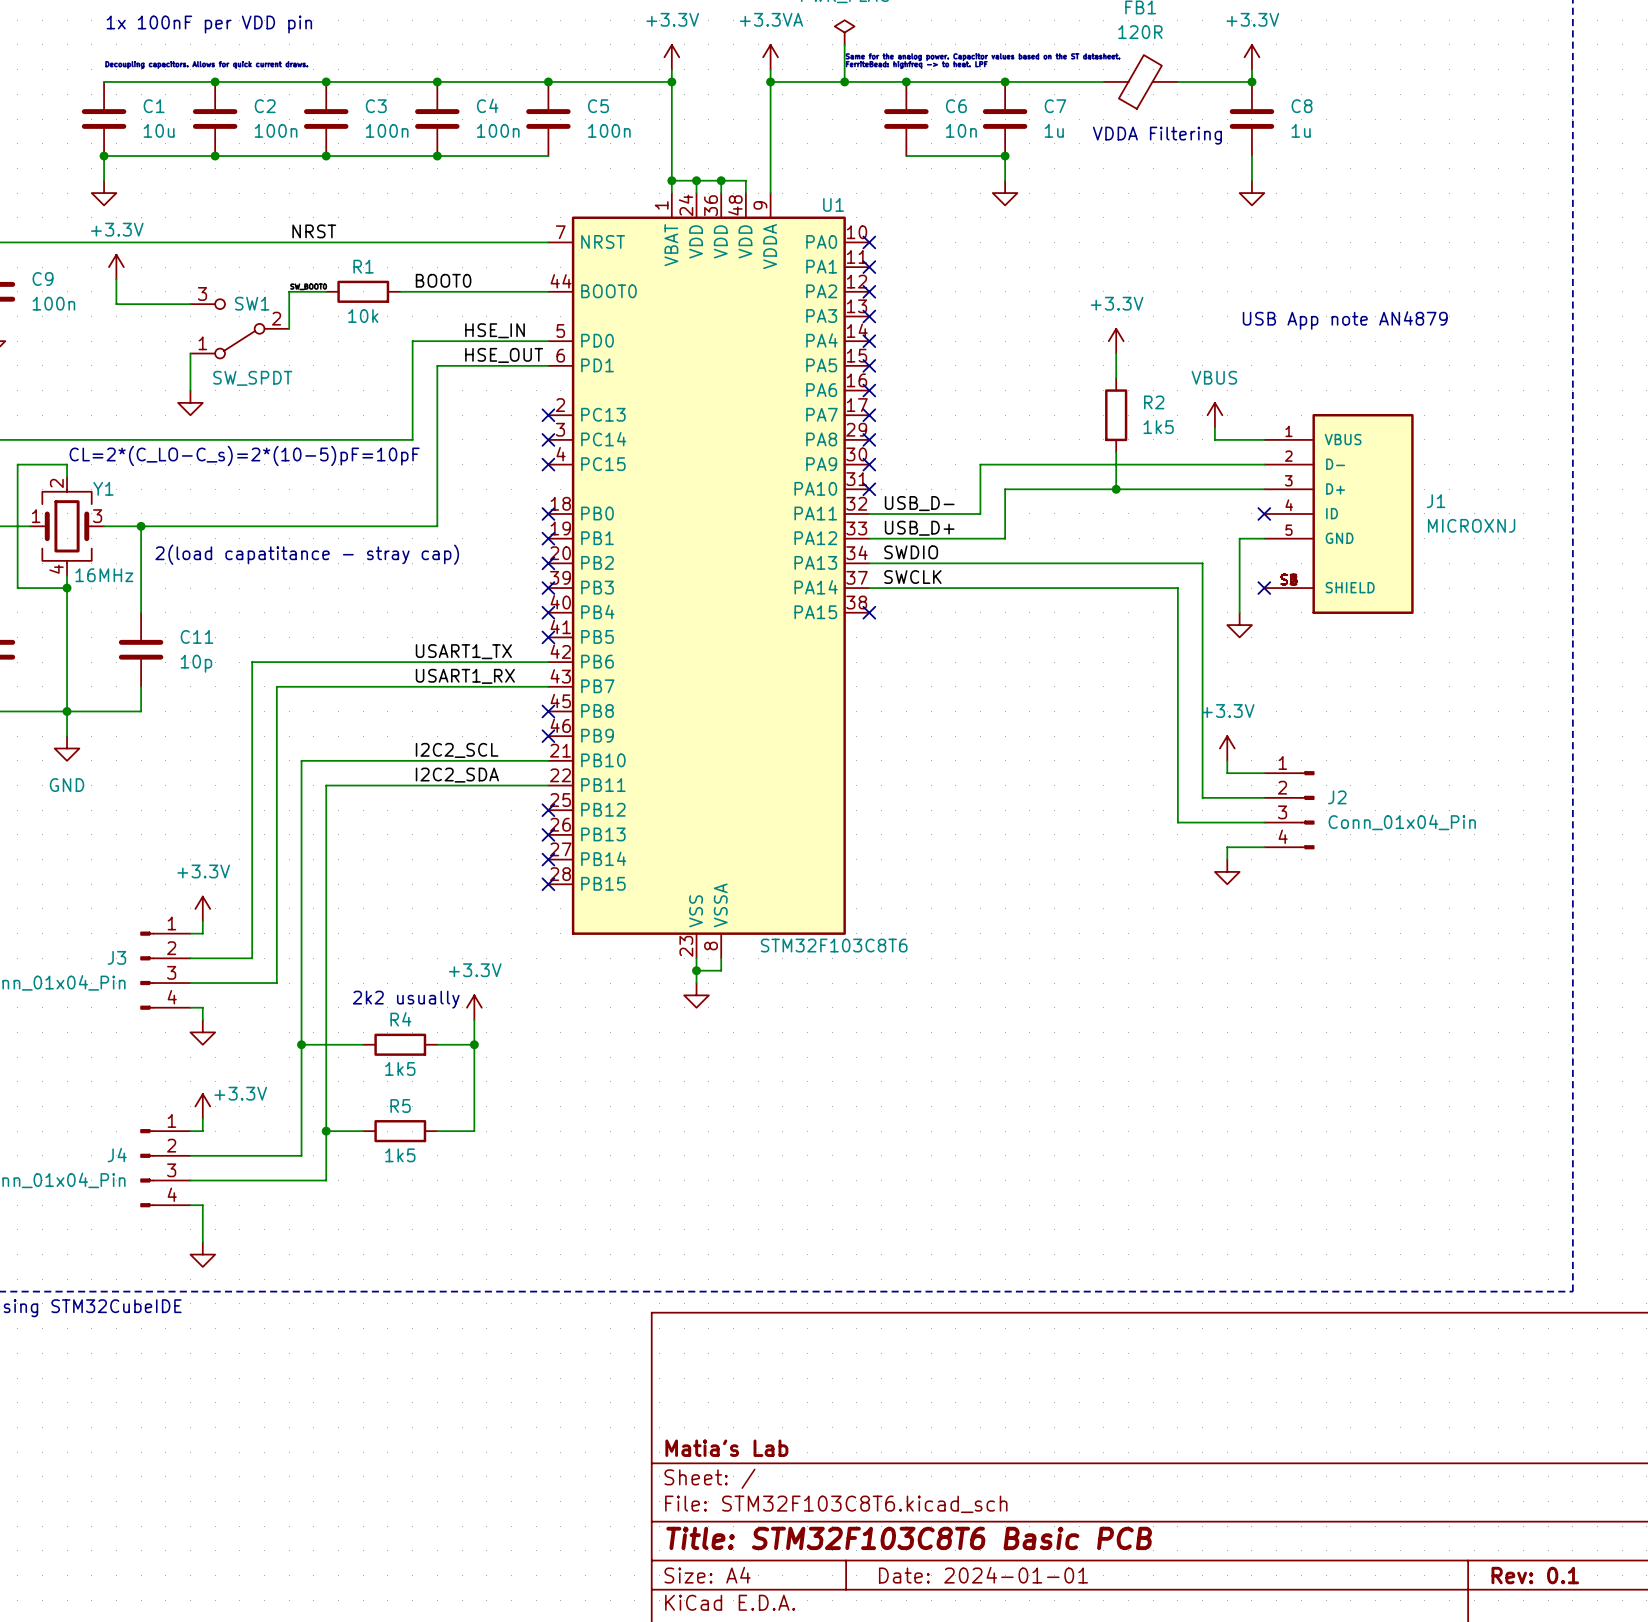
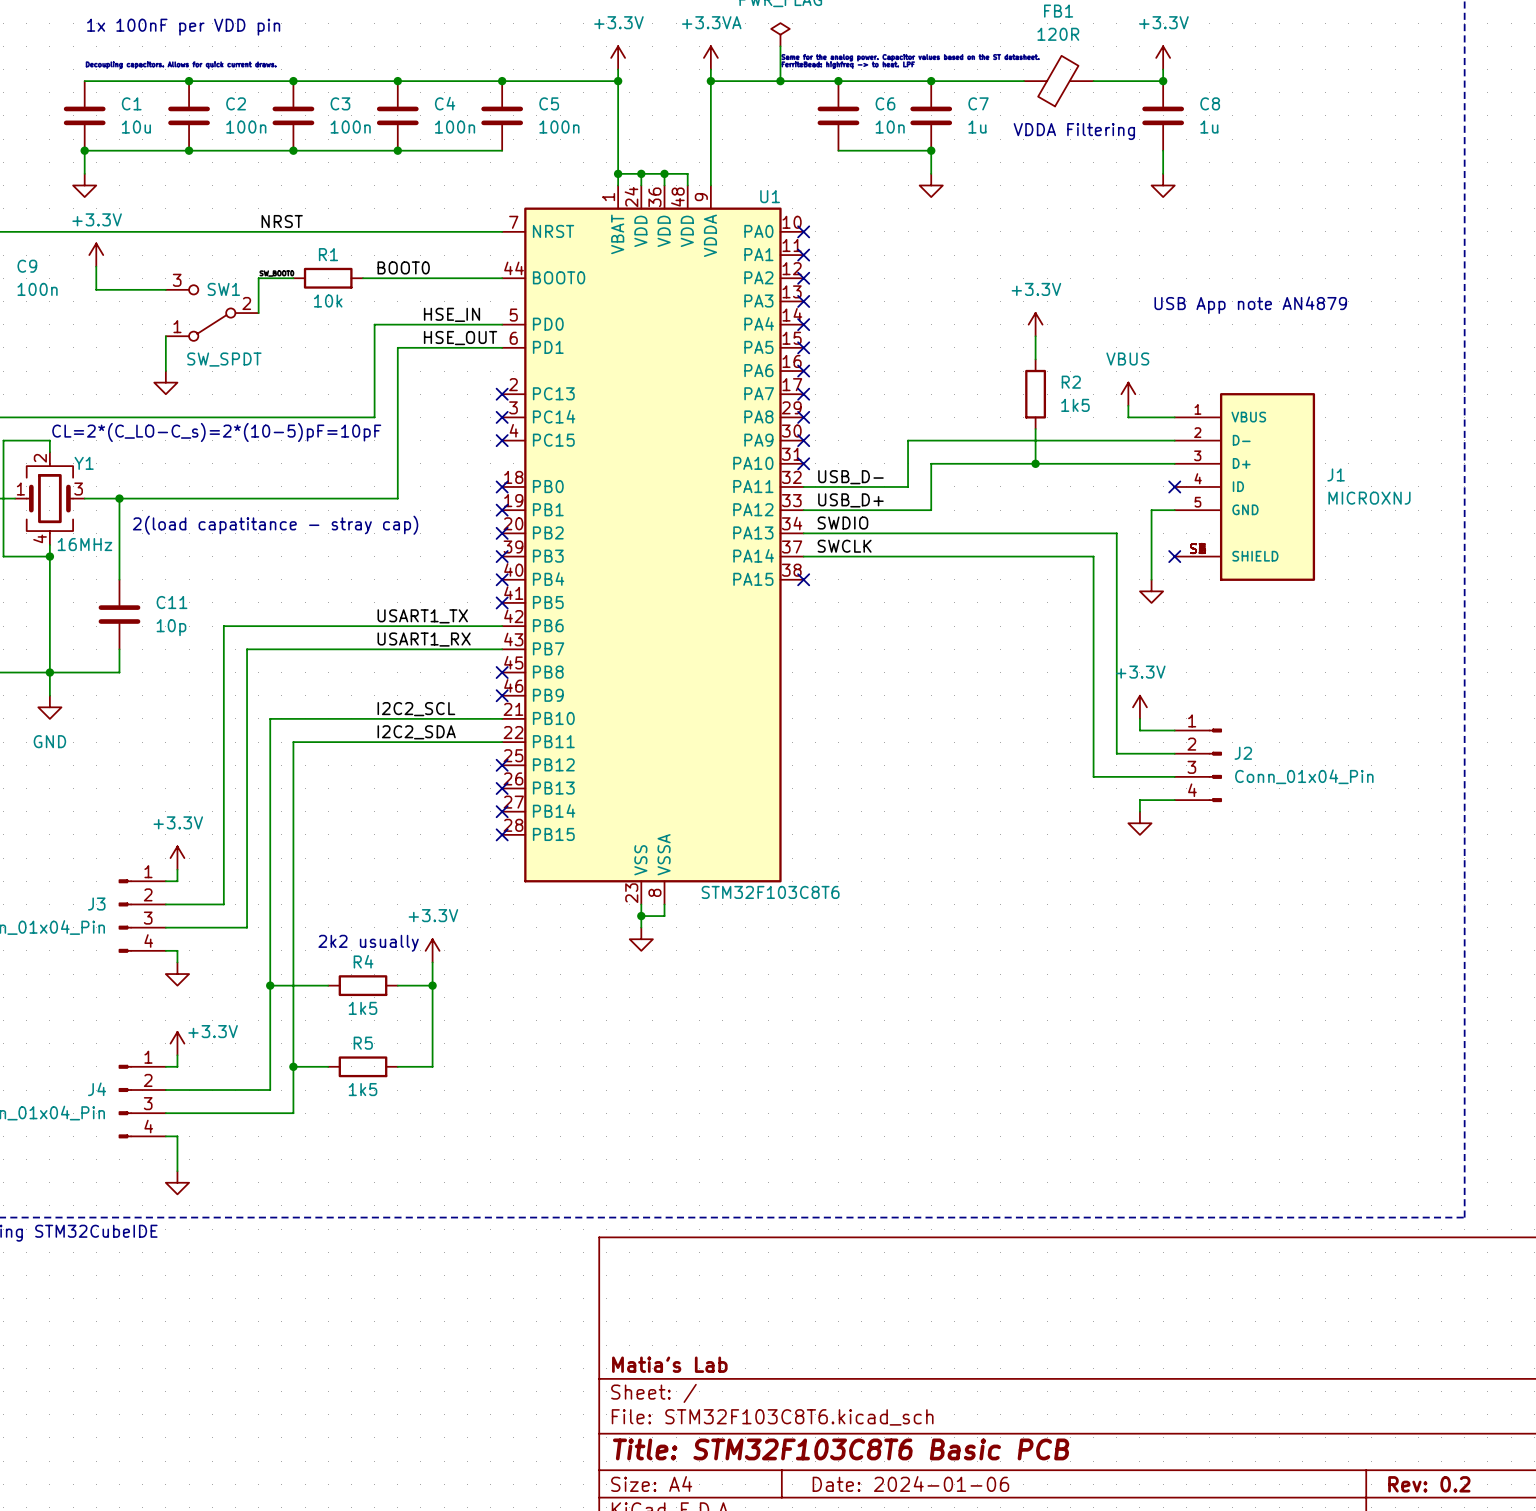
title block: Date: 2024-01-01 (983, 1575) -> Date: 2024-01-06 (910, 1483)
title block: Rev: 0.1 (1535, 1575) -> Rev: 0.2 (1429, 1484)

